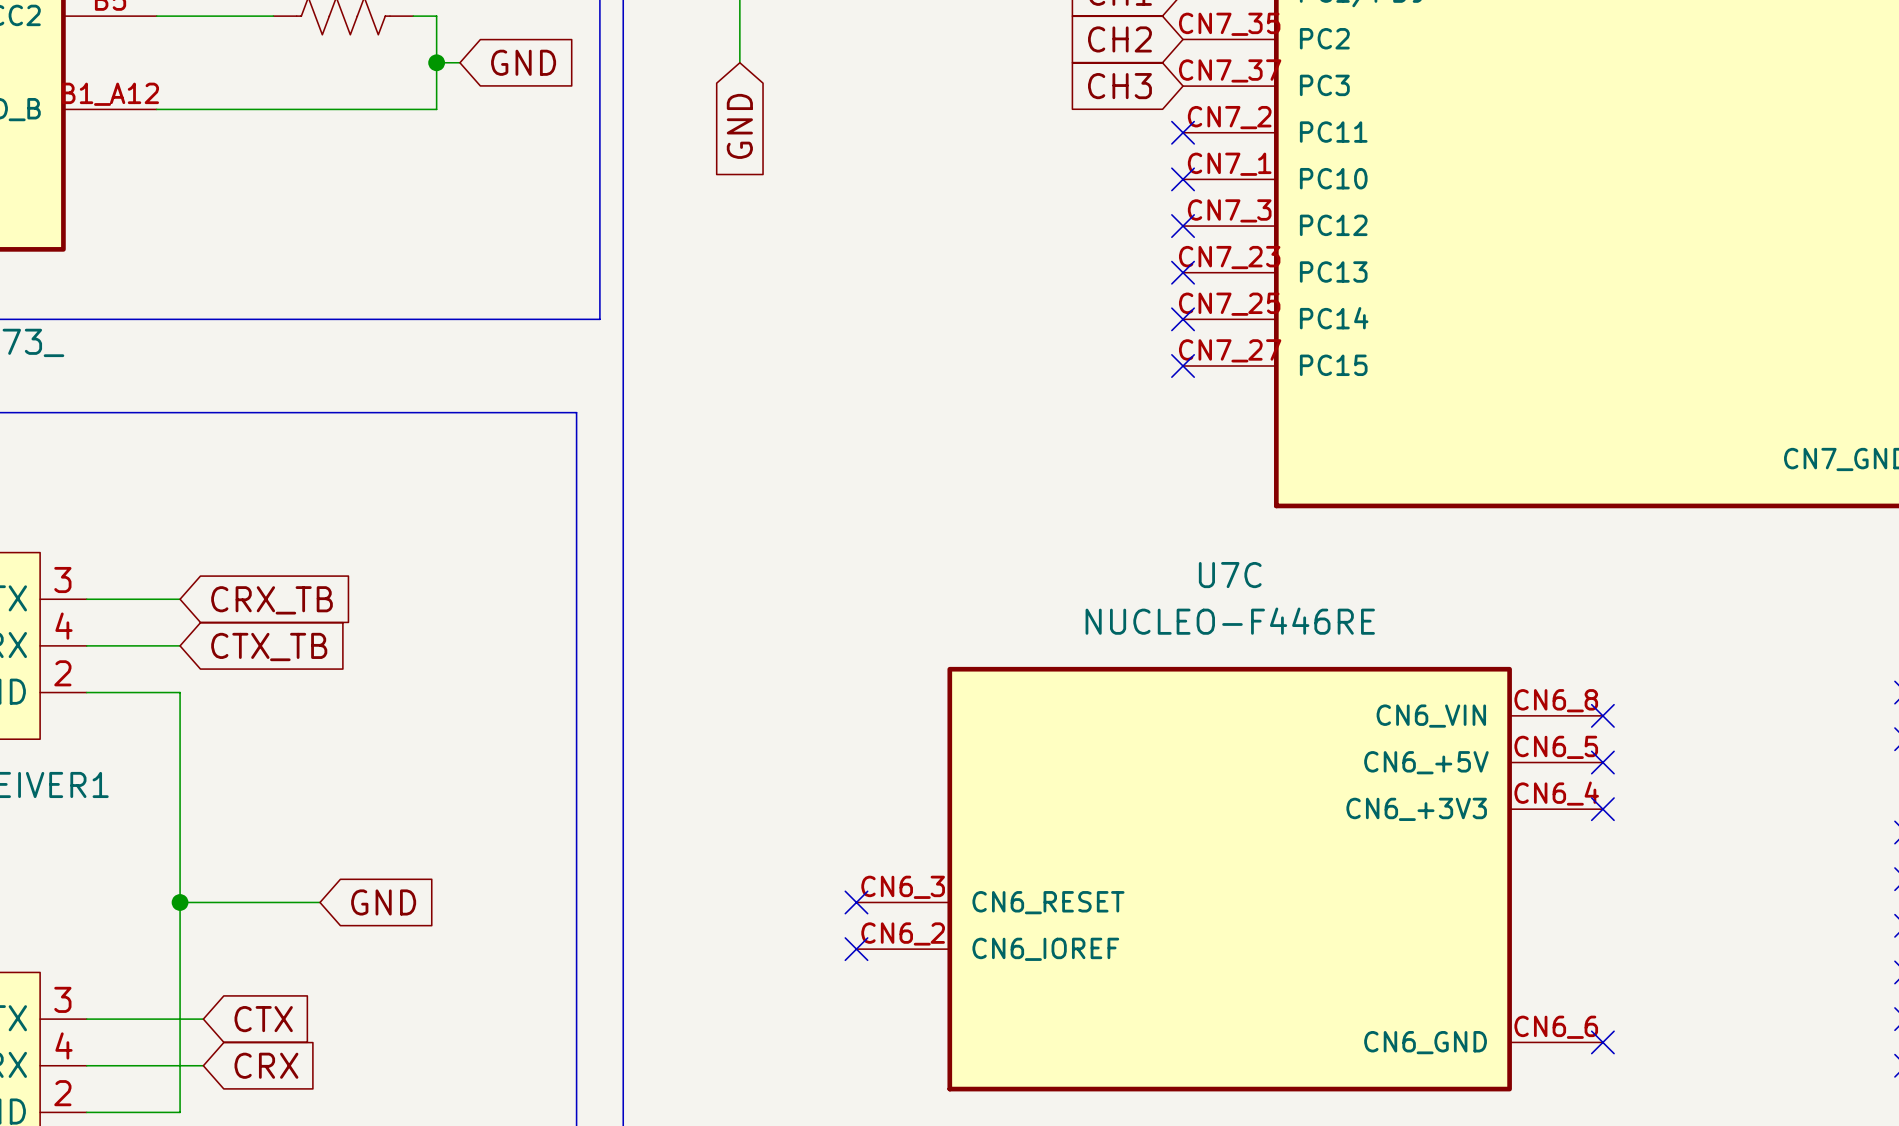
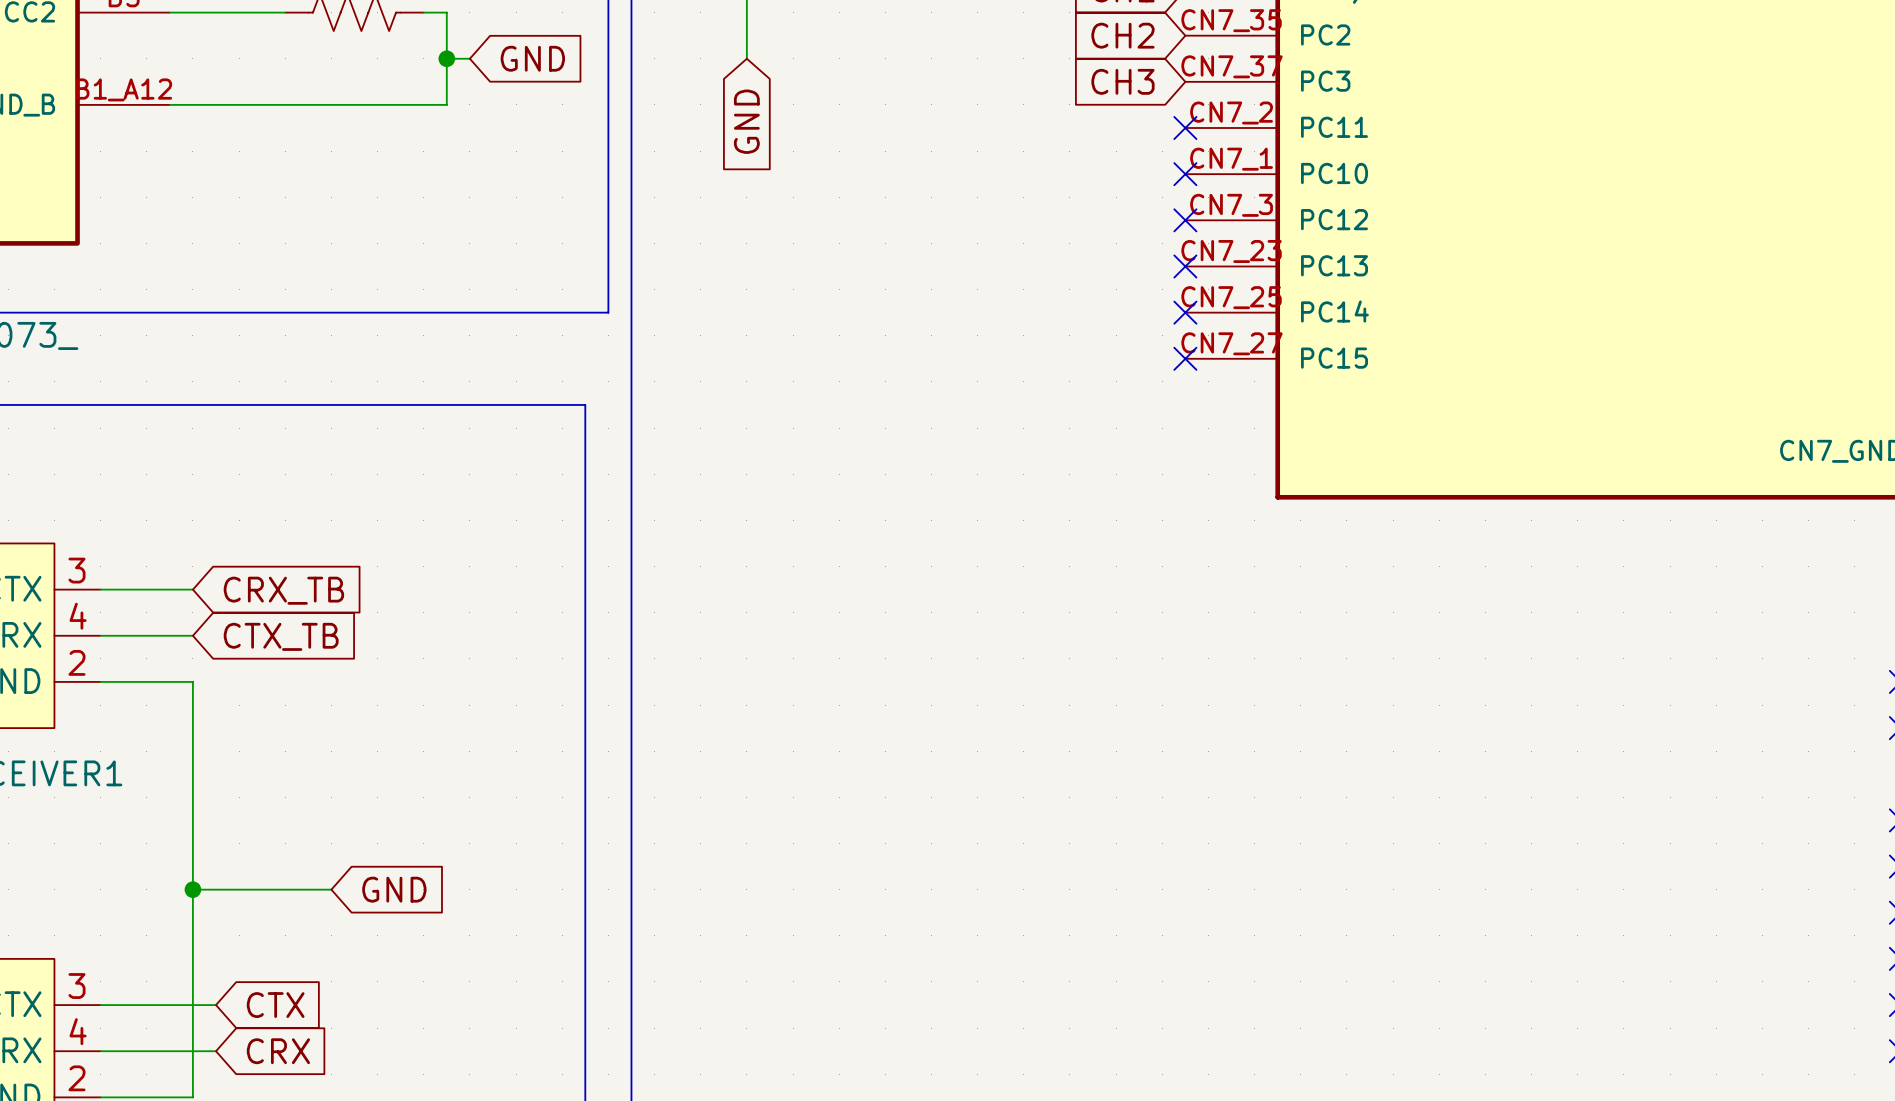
no-connect mark: (1602, 715) -> none
no-connect mark: (1602, 762) -> none
no-connect mark: (1602, 809) -> none
U7C: NUCLEO-F446RE (1229, 879) -> none
no-connect mark: (856, 902) -> none
no-connect mark: (856, 949) -> none
no-connect mark: (1602, 1042) -> none

